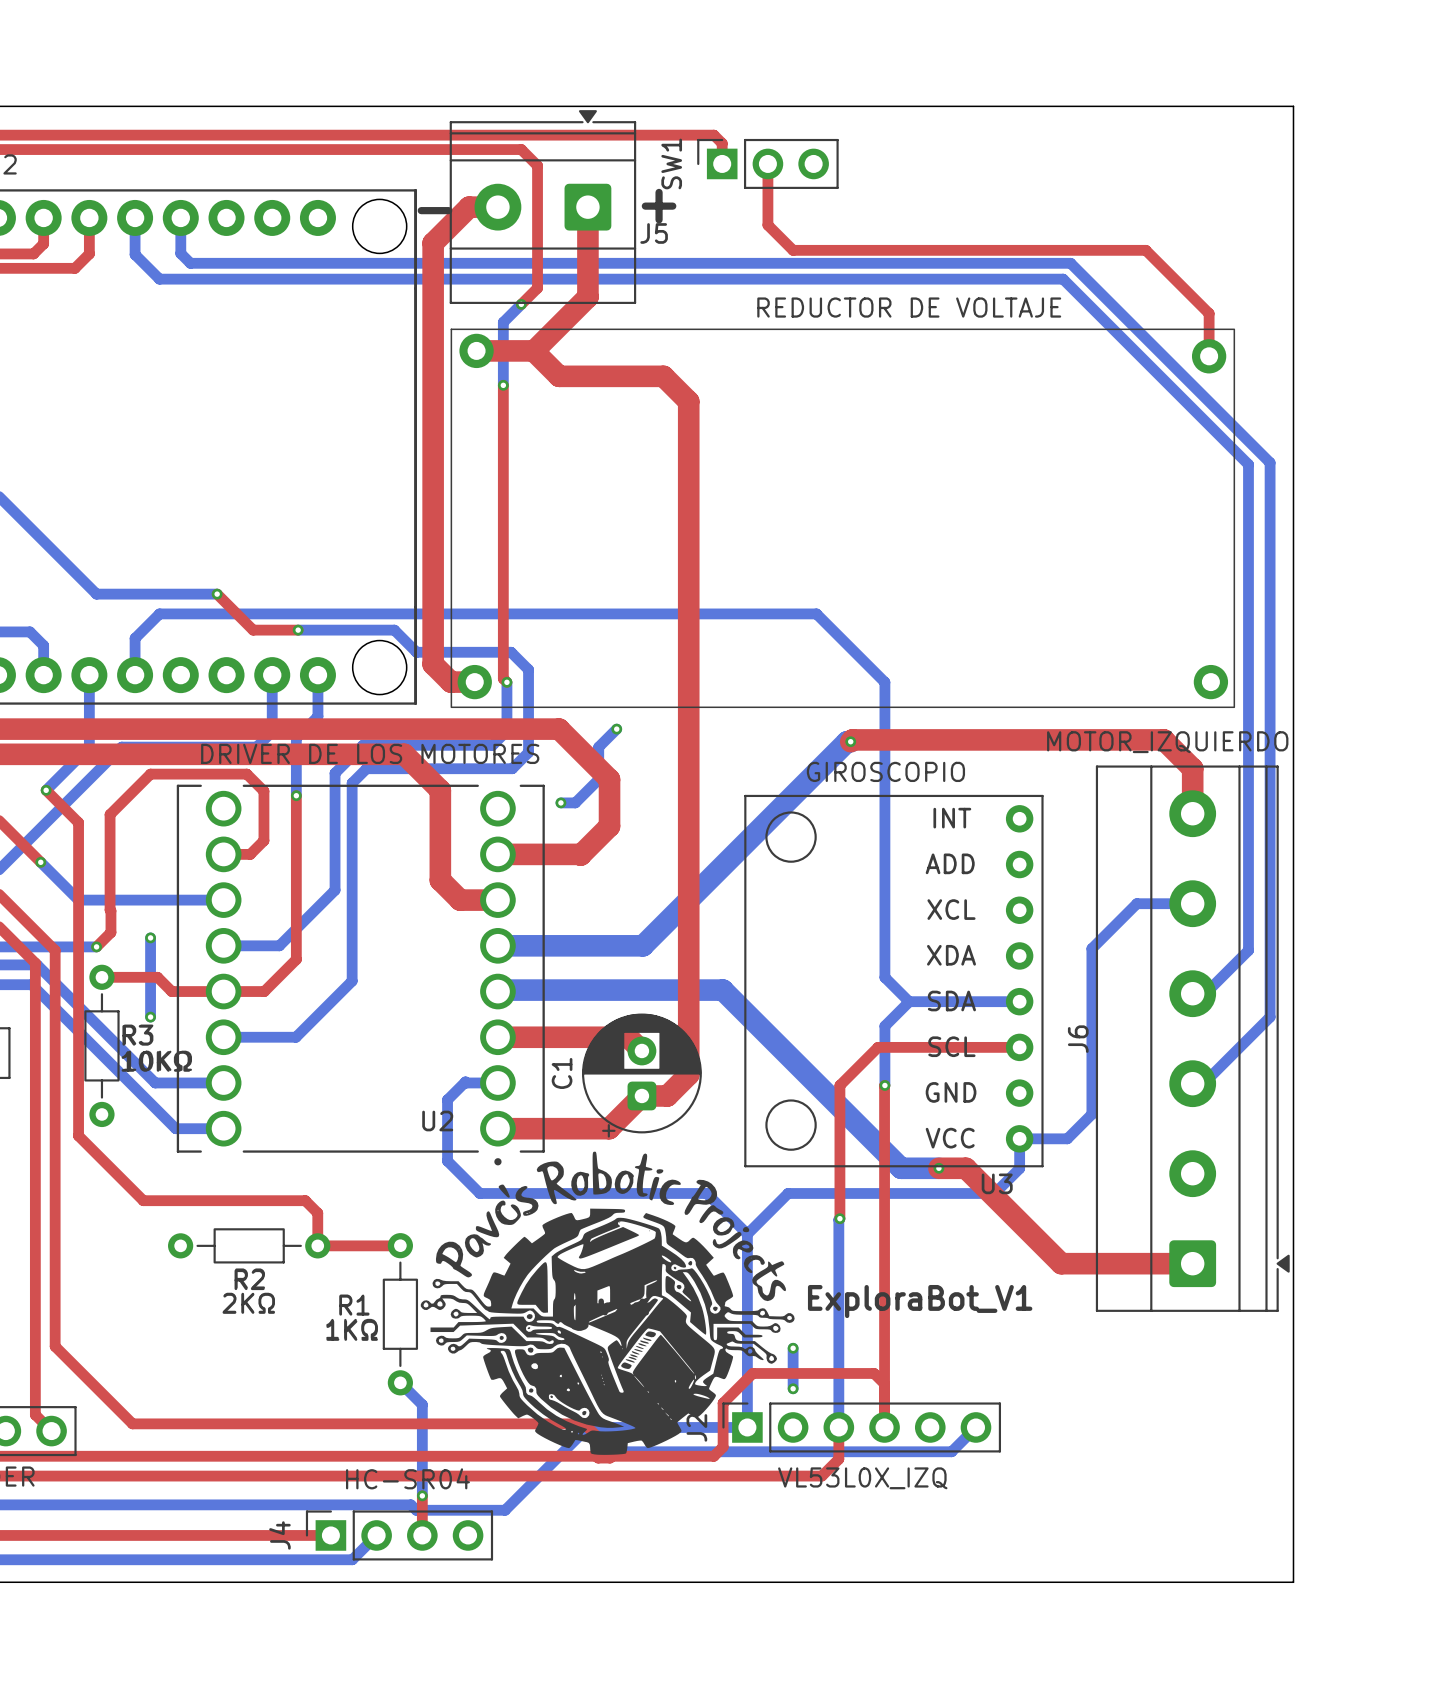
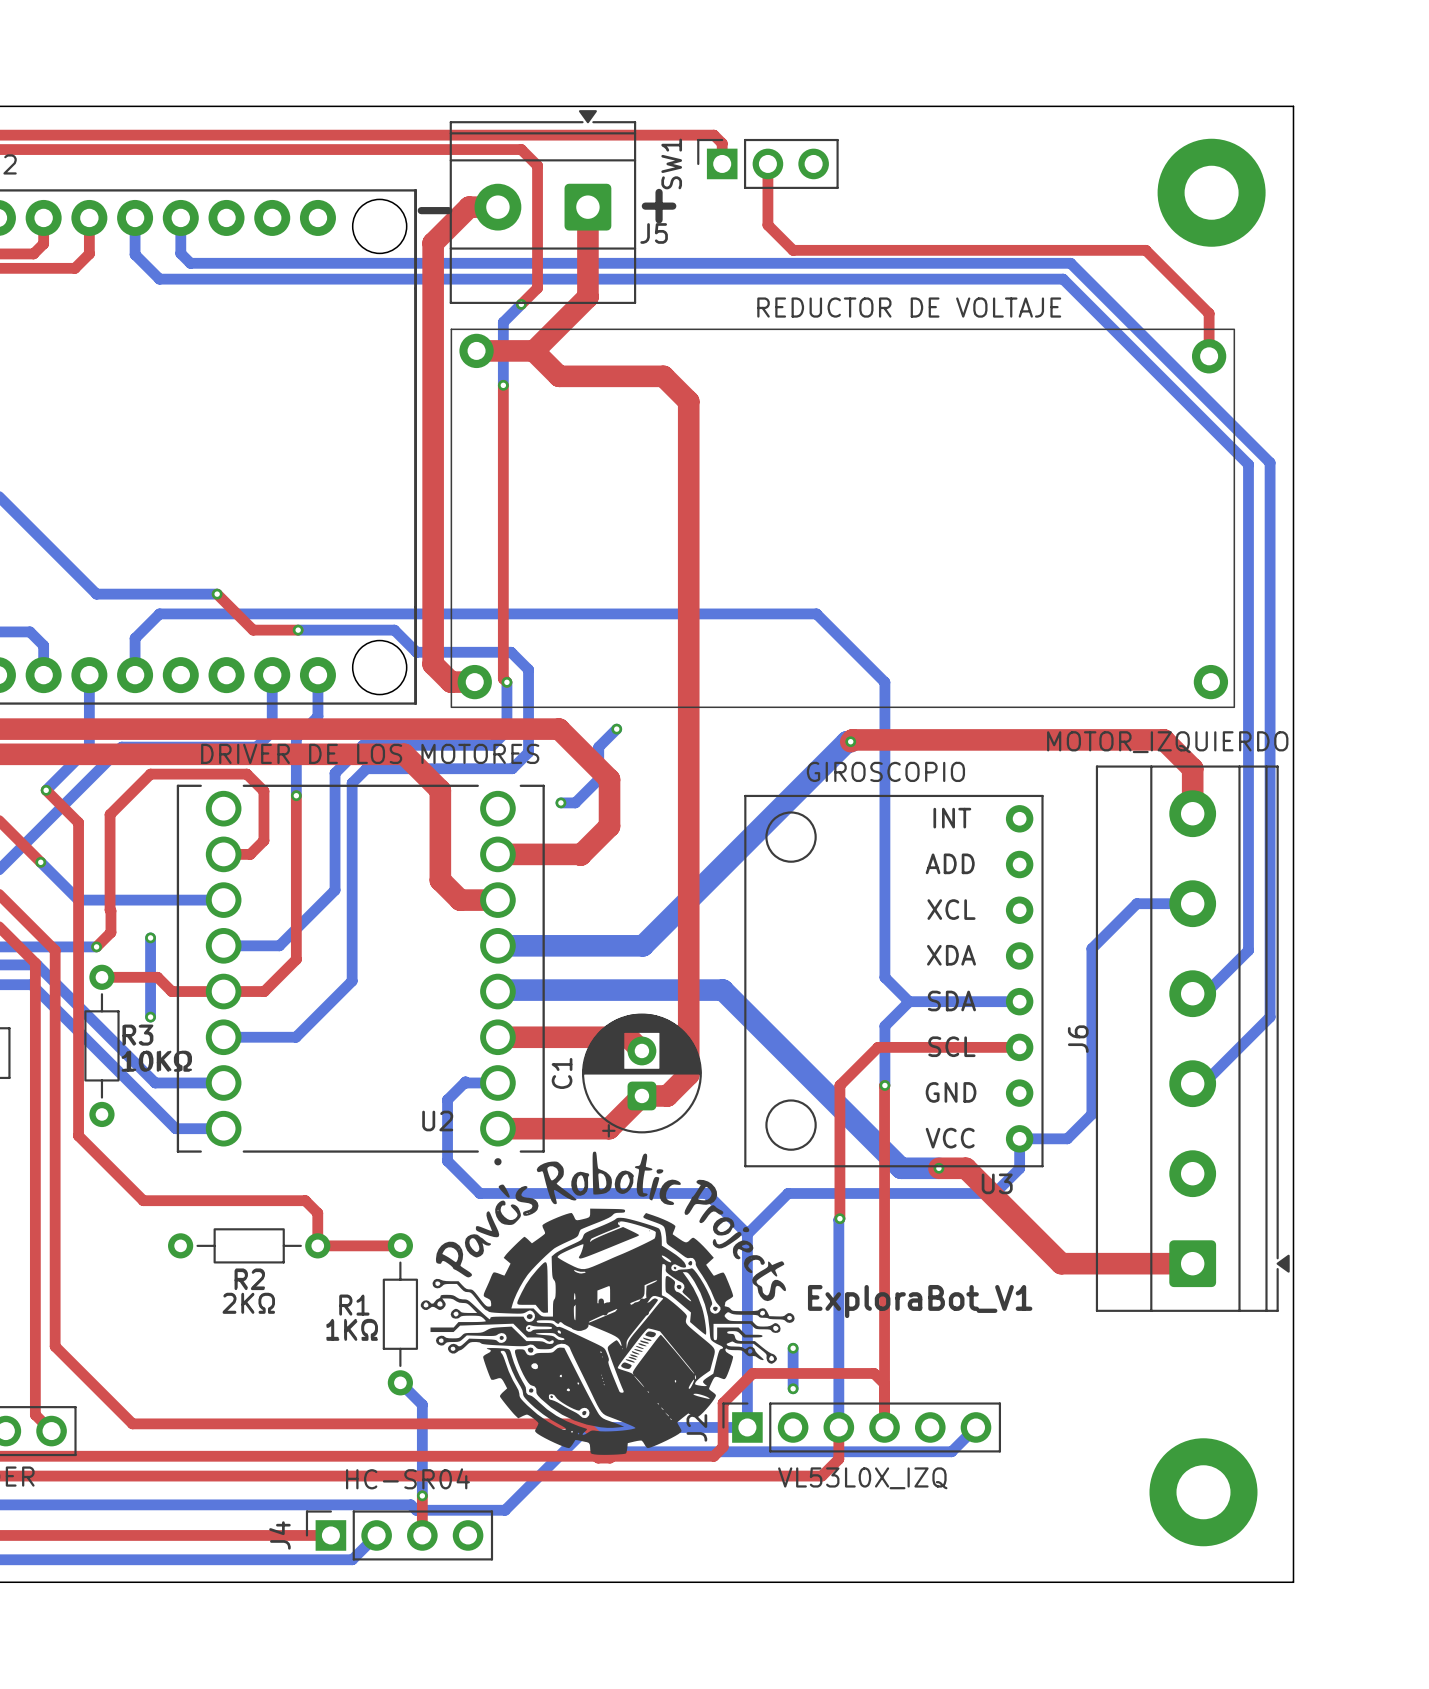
part: none -> (1211, 192)
part: none -> (1203, 1492)

